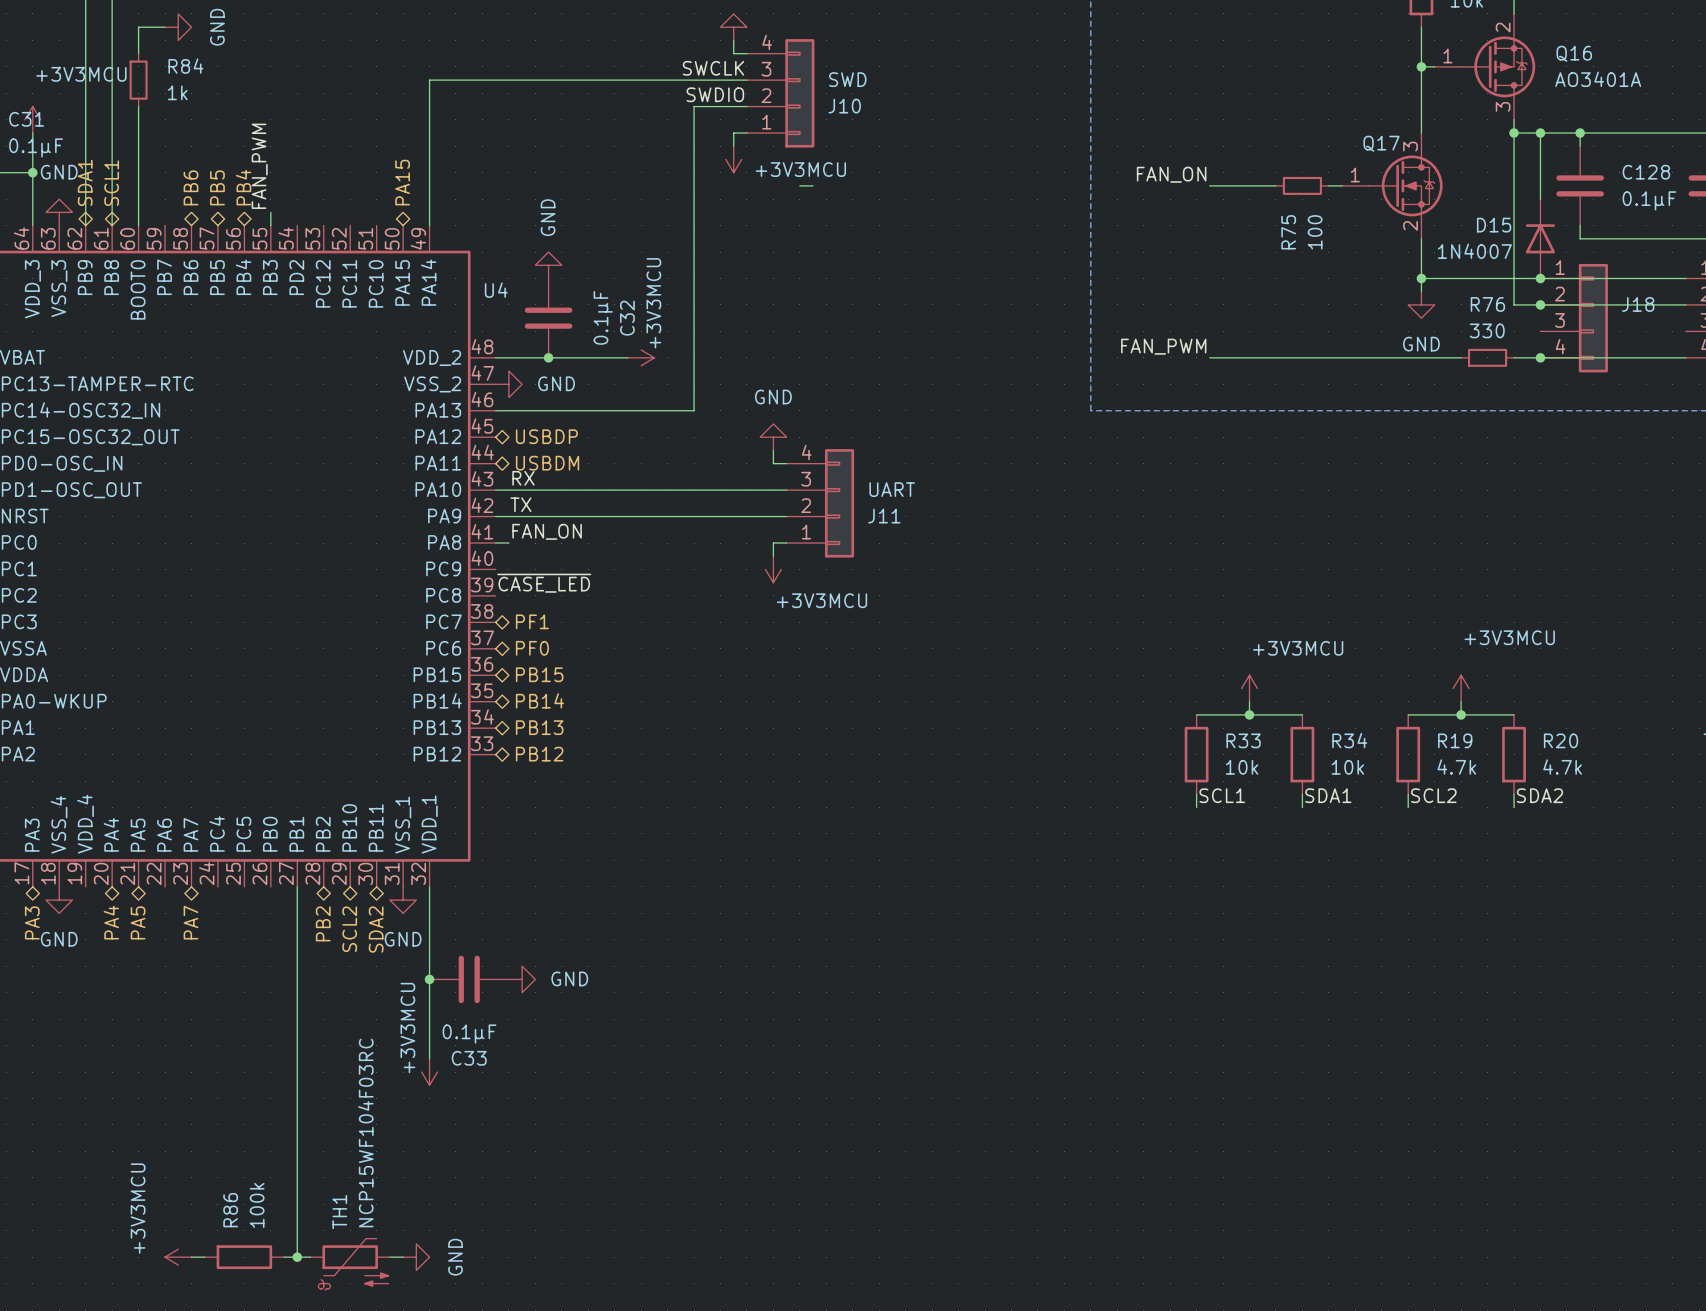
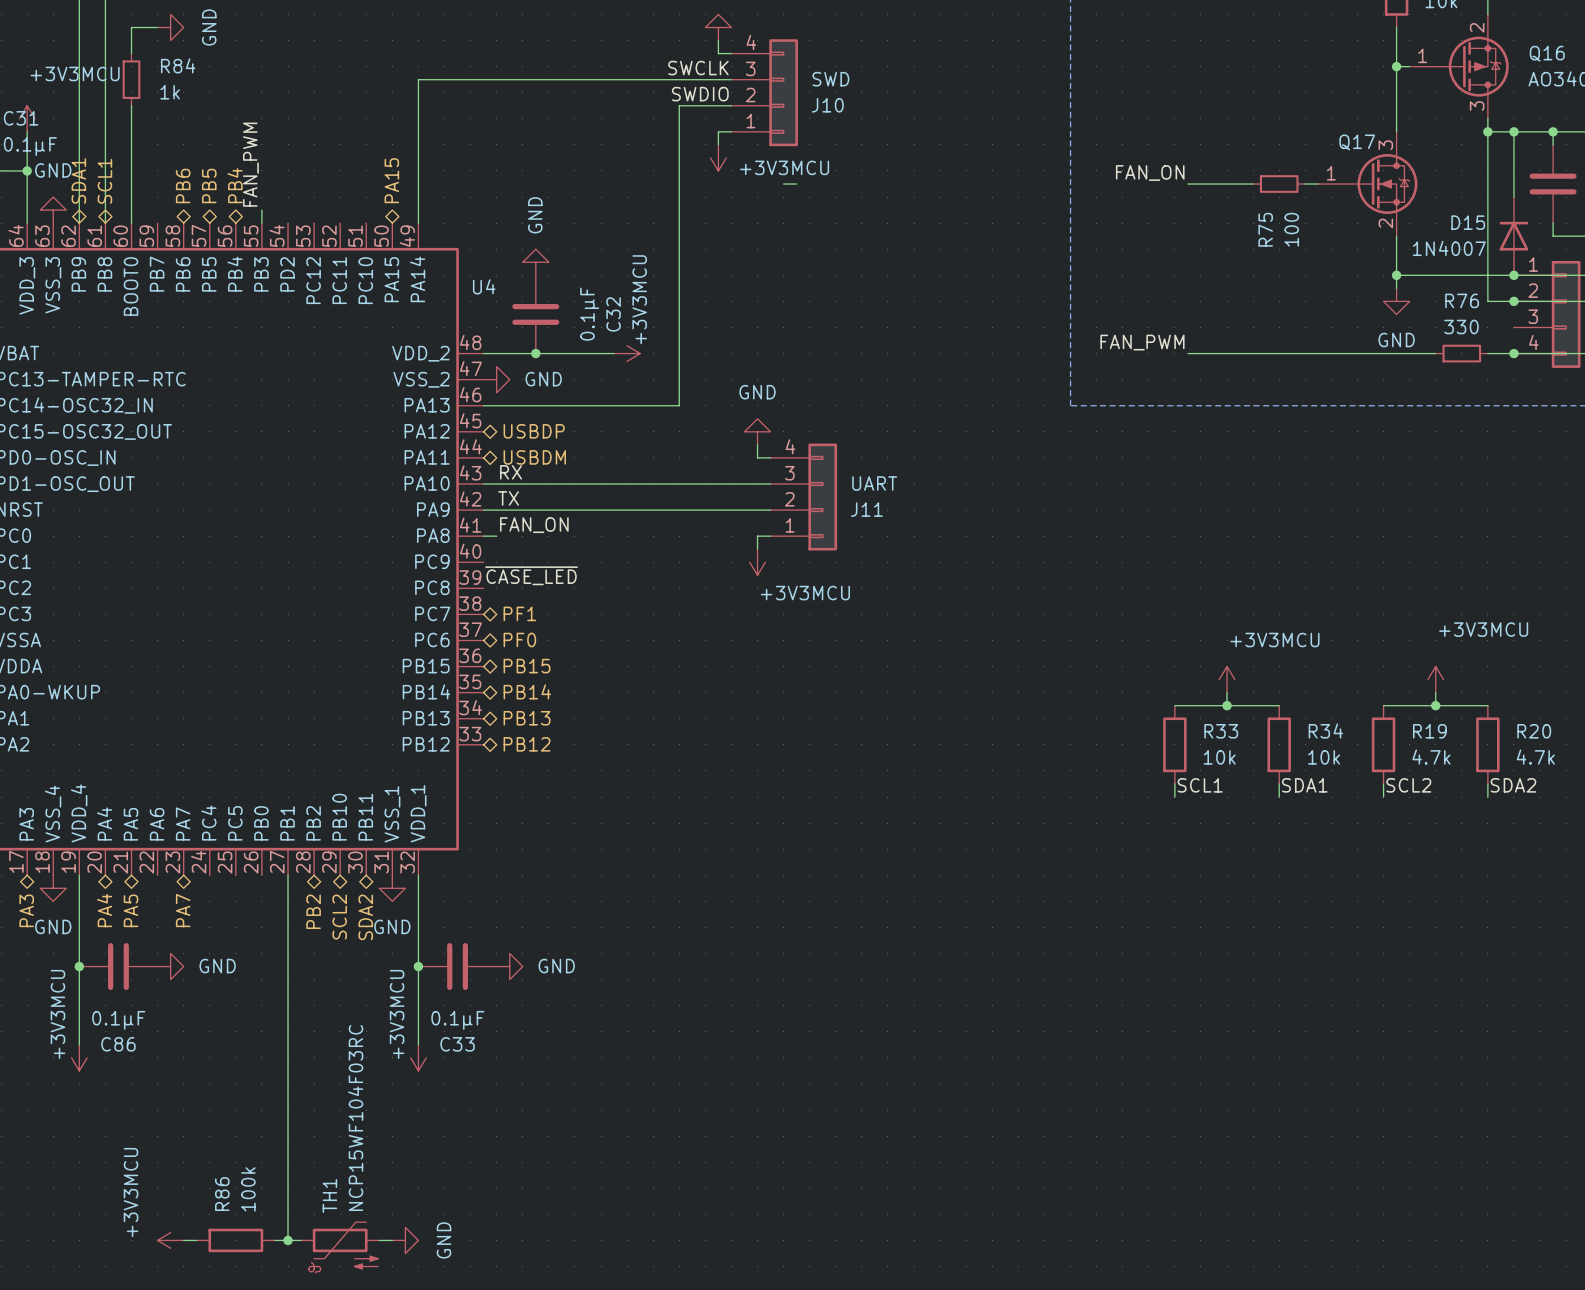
wire: none -> (79, 875) (79, 1044)
junction: none -> (79, 966)
C86: none -> 0.1µF (118, 966)
power symbol: none -> GND (170, 966)
power symbol: none -> +3V3MCU (79, 1057)

